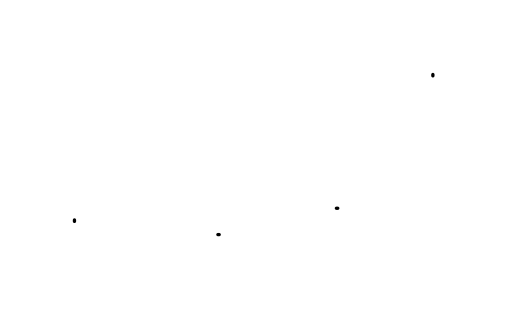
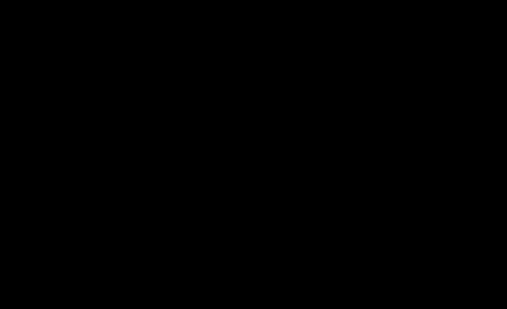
board edge: (432, 74) (432, 75) -> none
board edge: (336, 208) (337, 208) -> none
board edge: (74, 219) (74, 221) -> none
board edge: (217, 234) (219, 234) -> none

